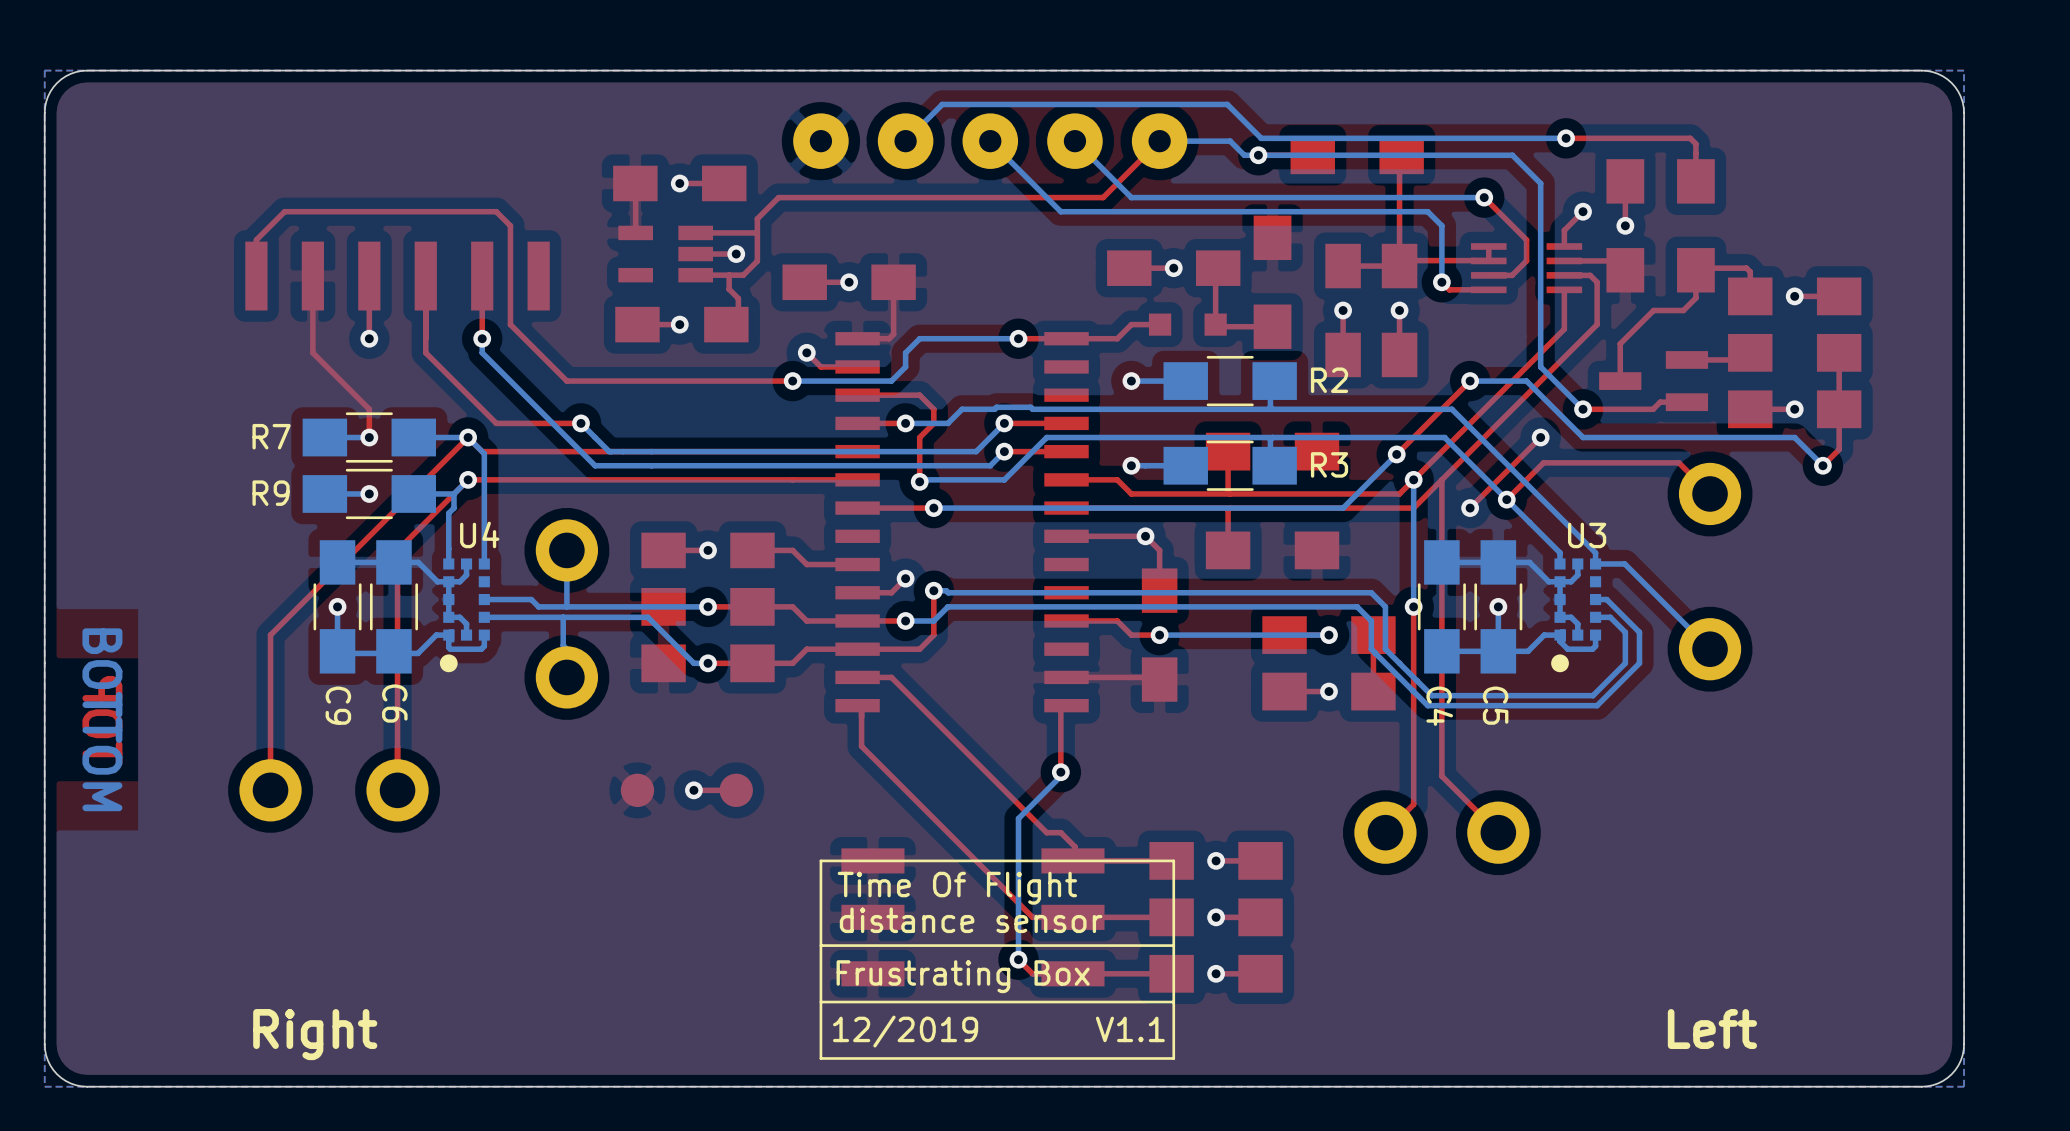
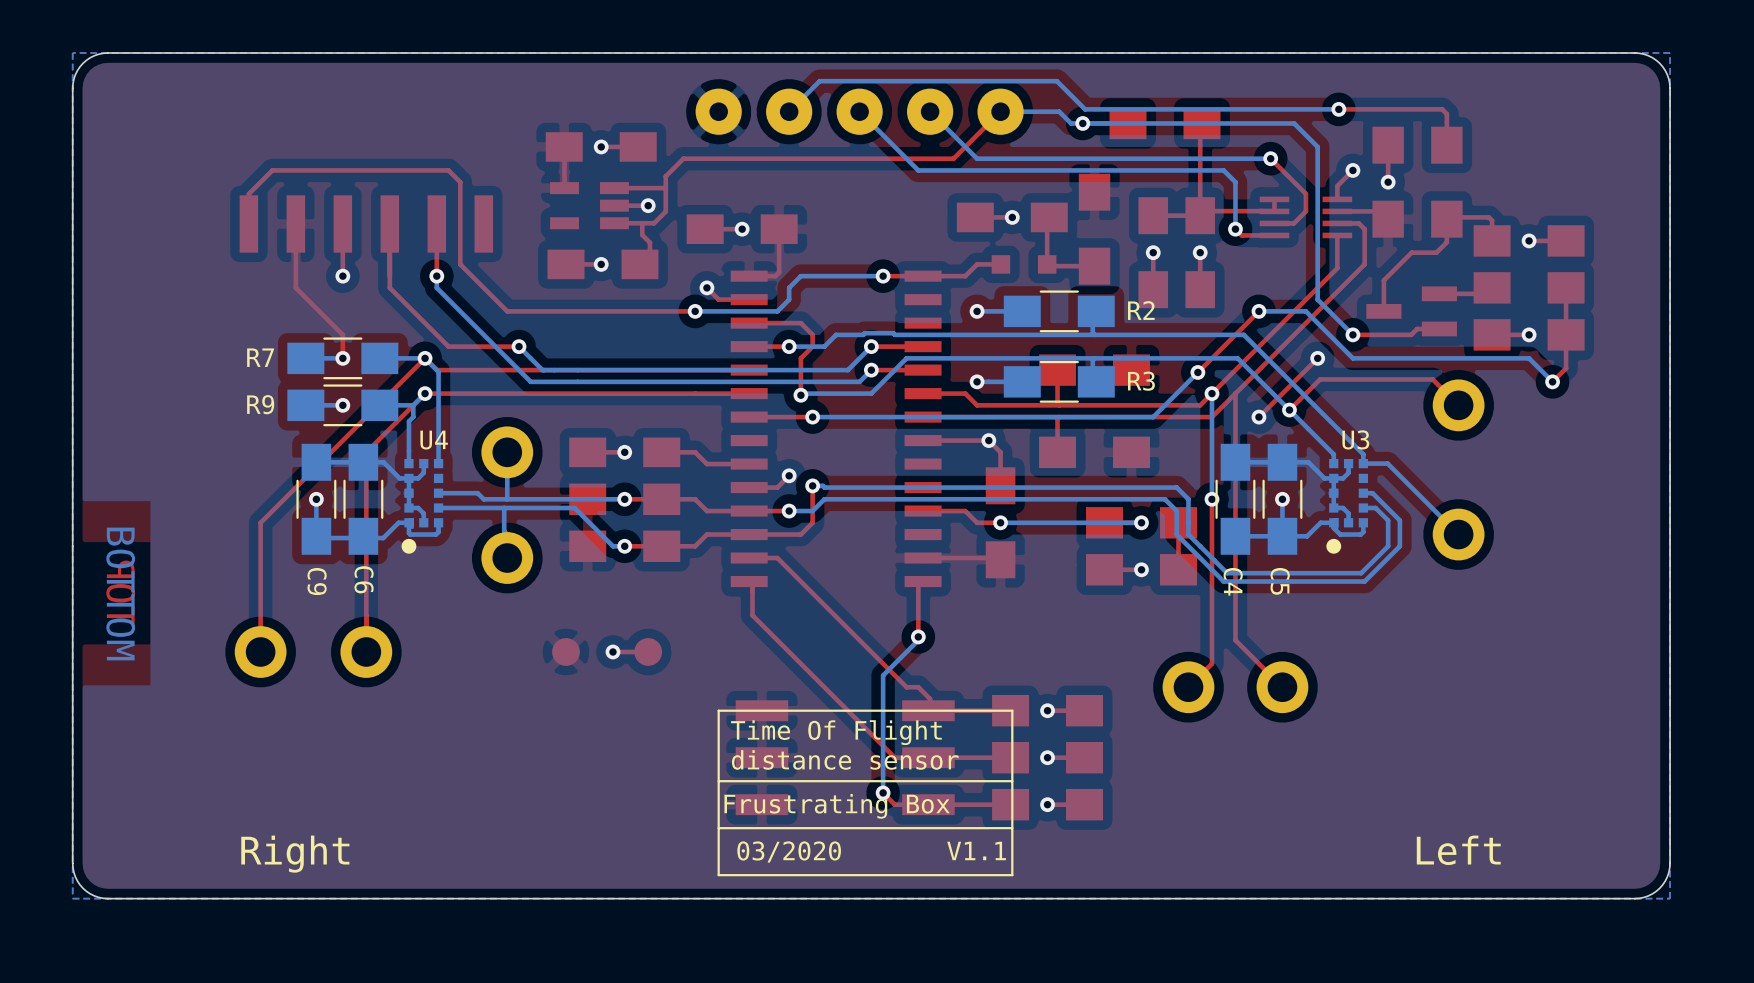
text: 12/2019 (905, 1031) -> 03/2020 (789, 851)

